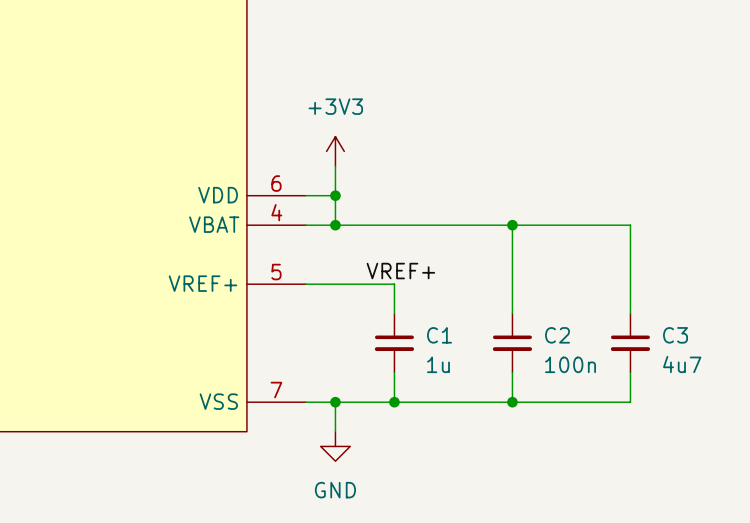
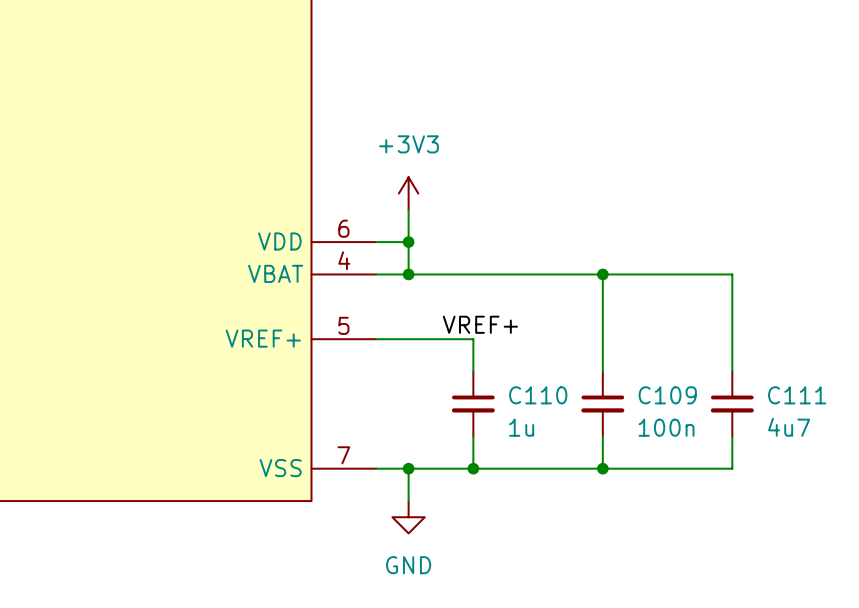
C1 name: C1 (439, 335) -> C110 (538, 395)
C2 name: C2 (557, 335) -> C109 (667, 395)
C3 name: C3 (675, 335) -> C111 (797, 395)

